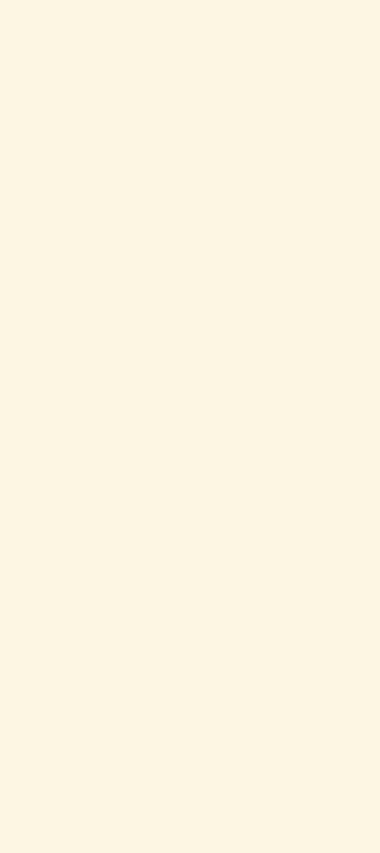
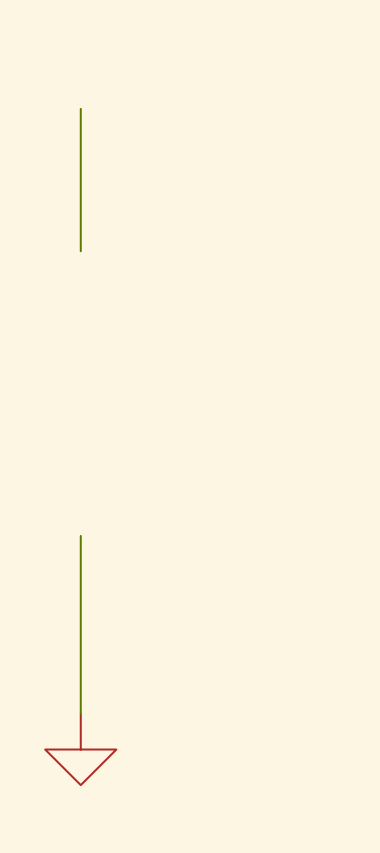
wire: none -> (80, 108) (80, 251)
wire: none -> (80, 535) (80, 713)
power symbol: none -> (80, 749)

